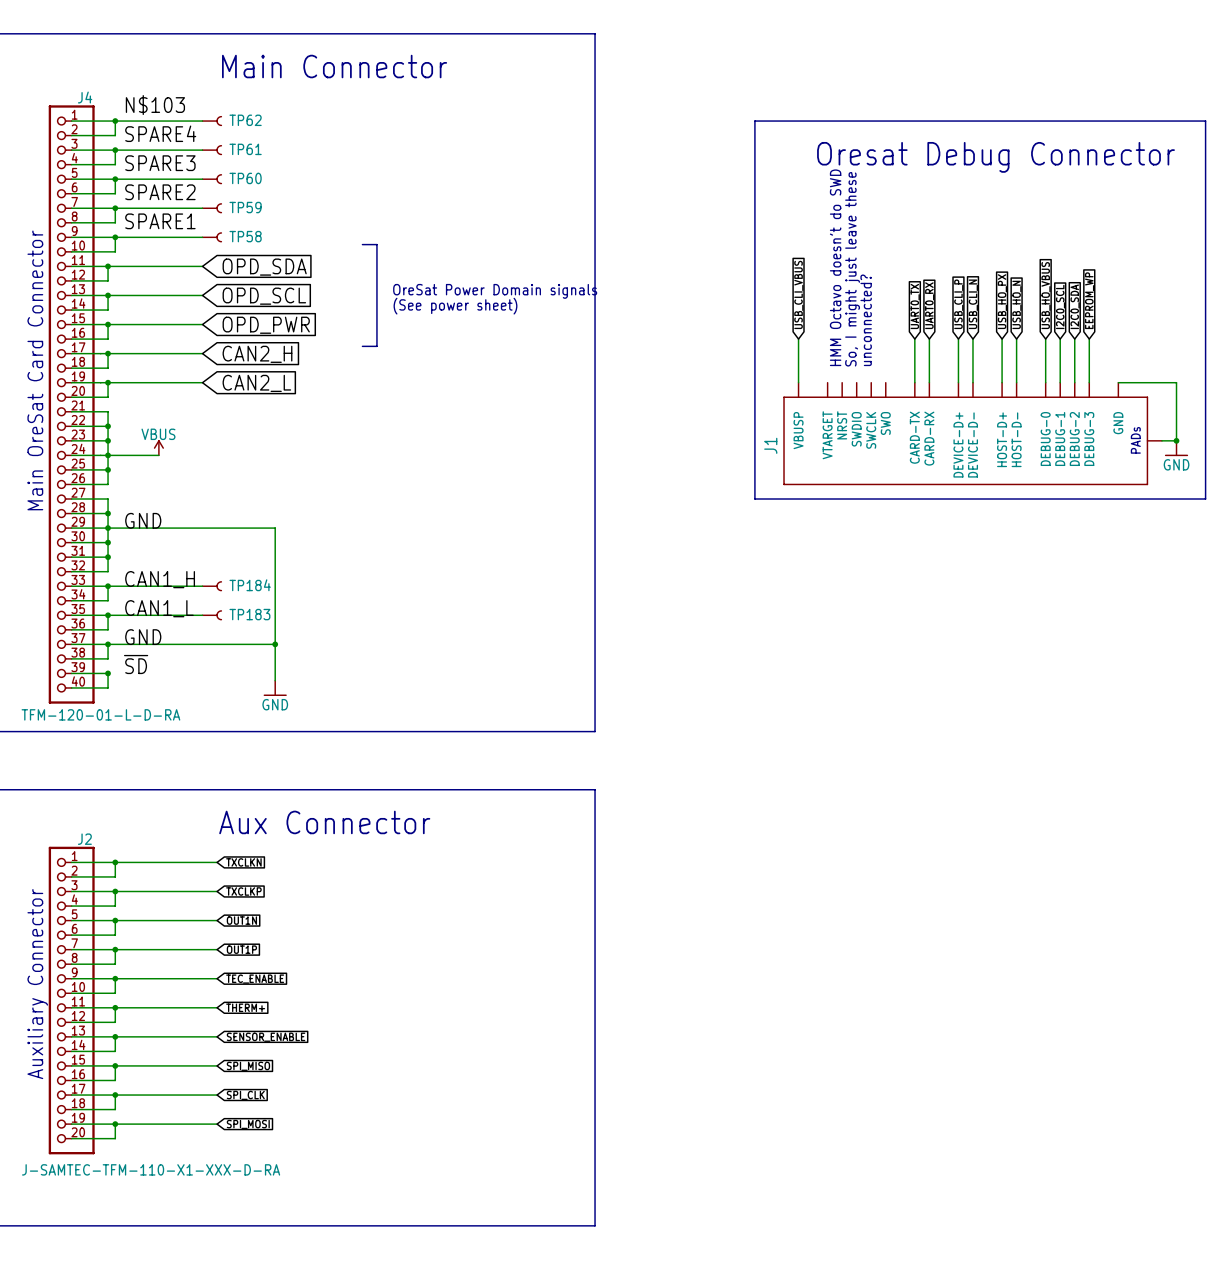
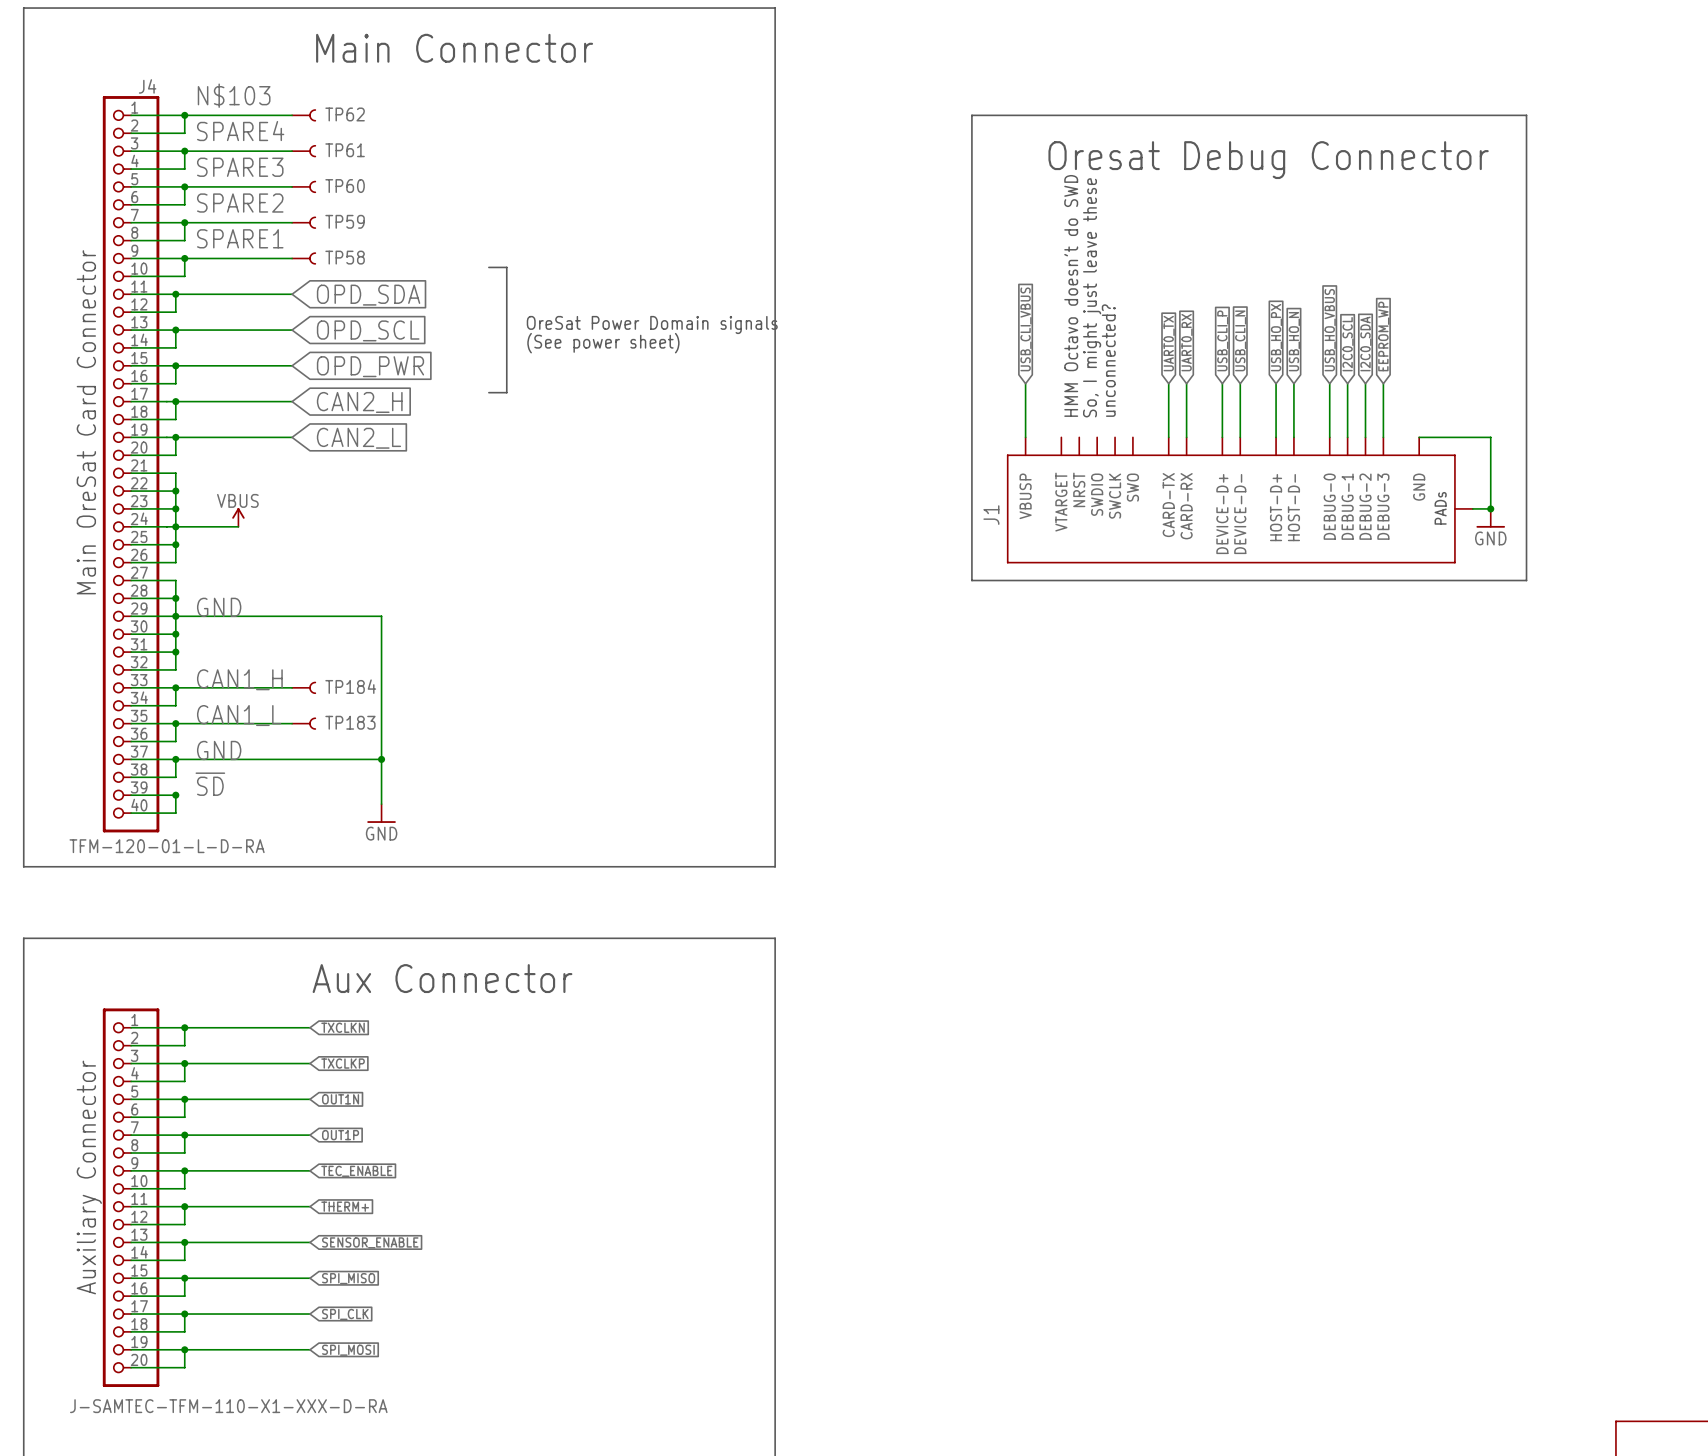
J2 name: J2 (84, 839) -> none

